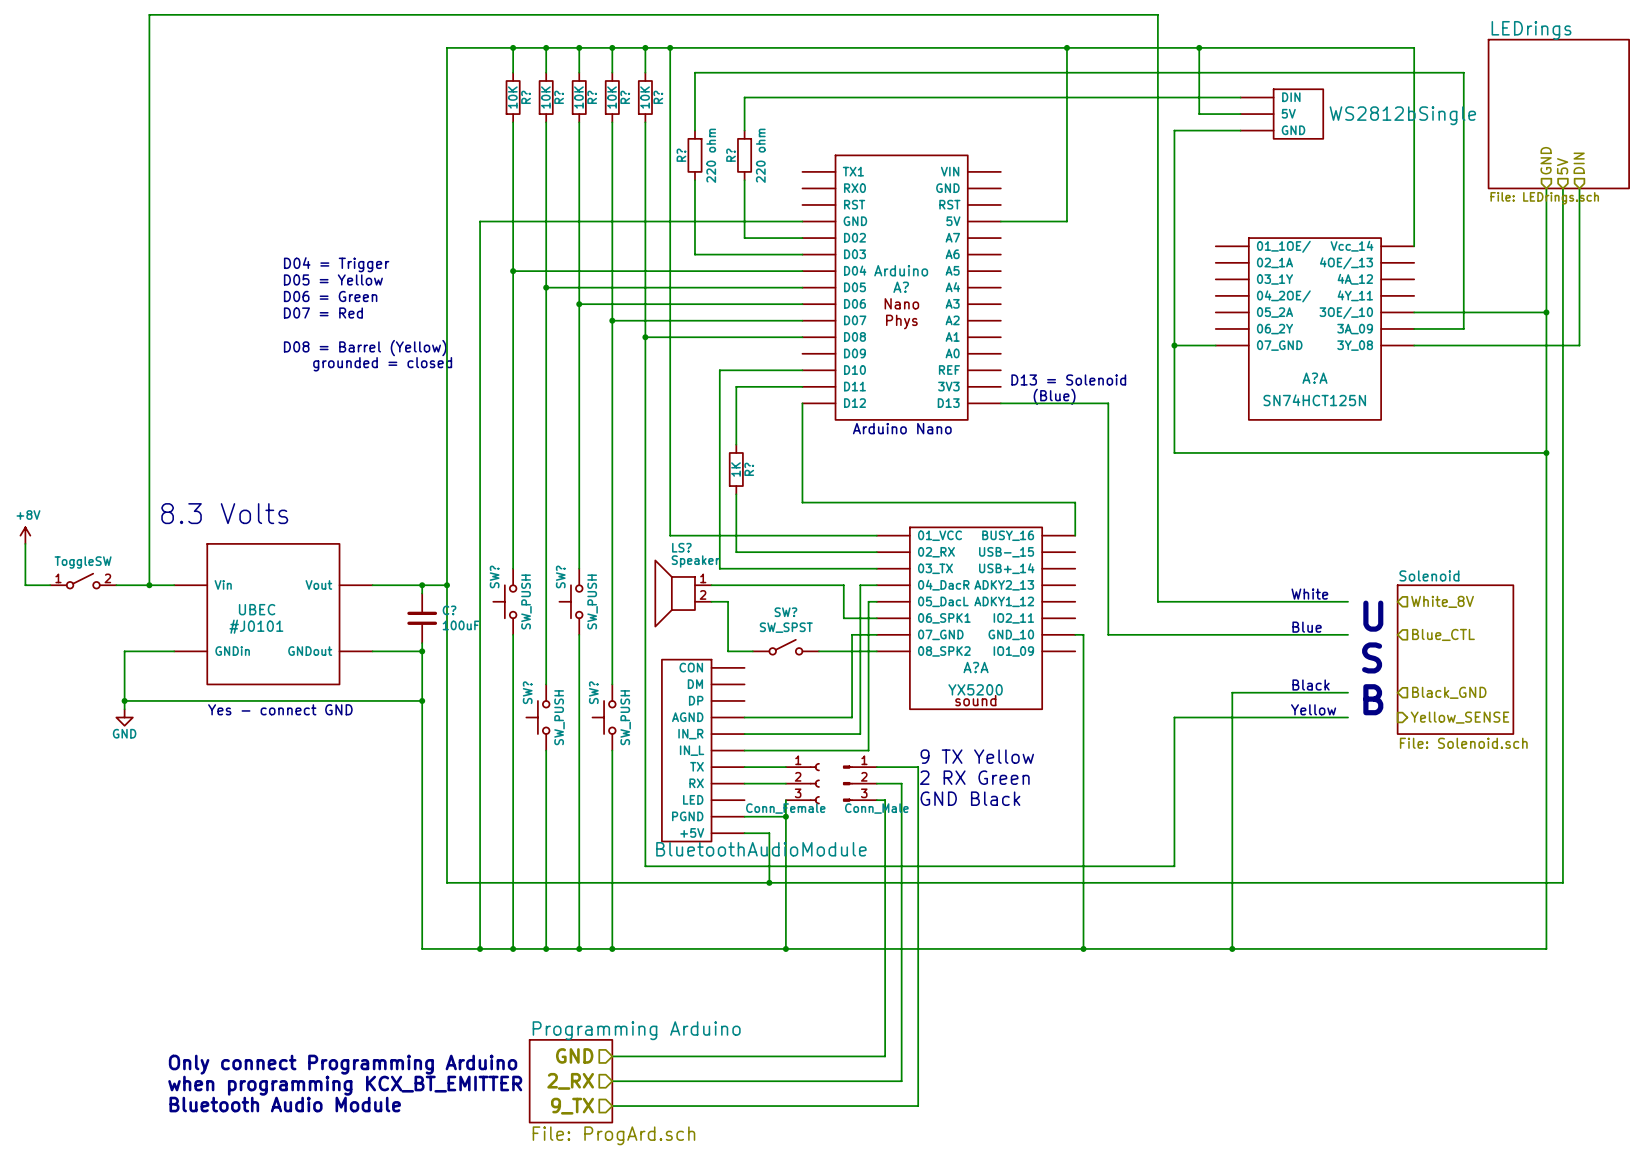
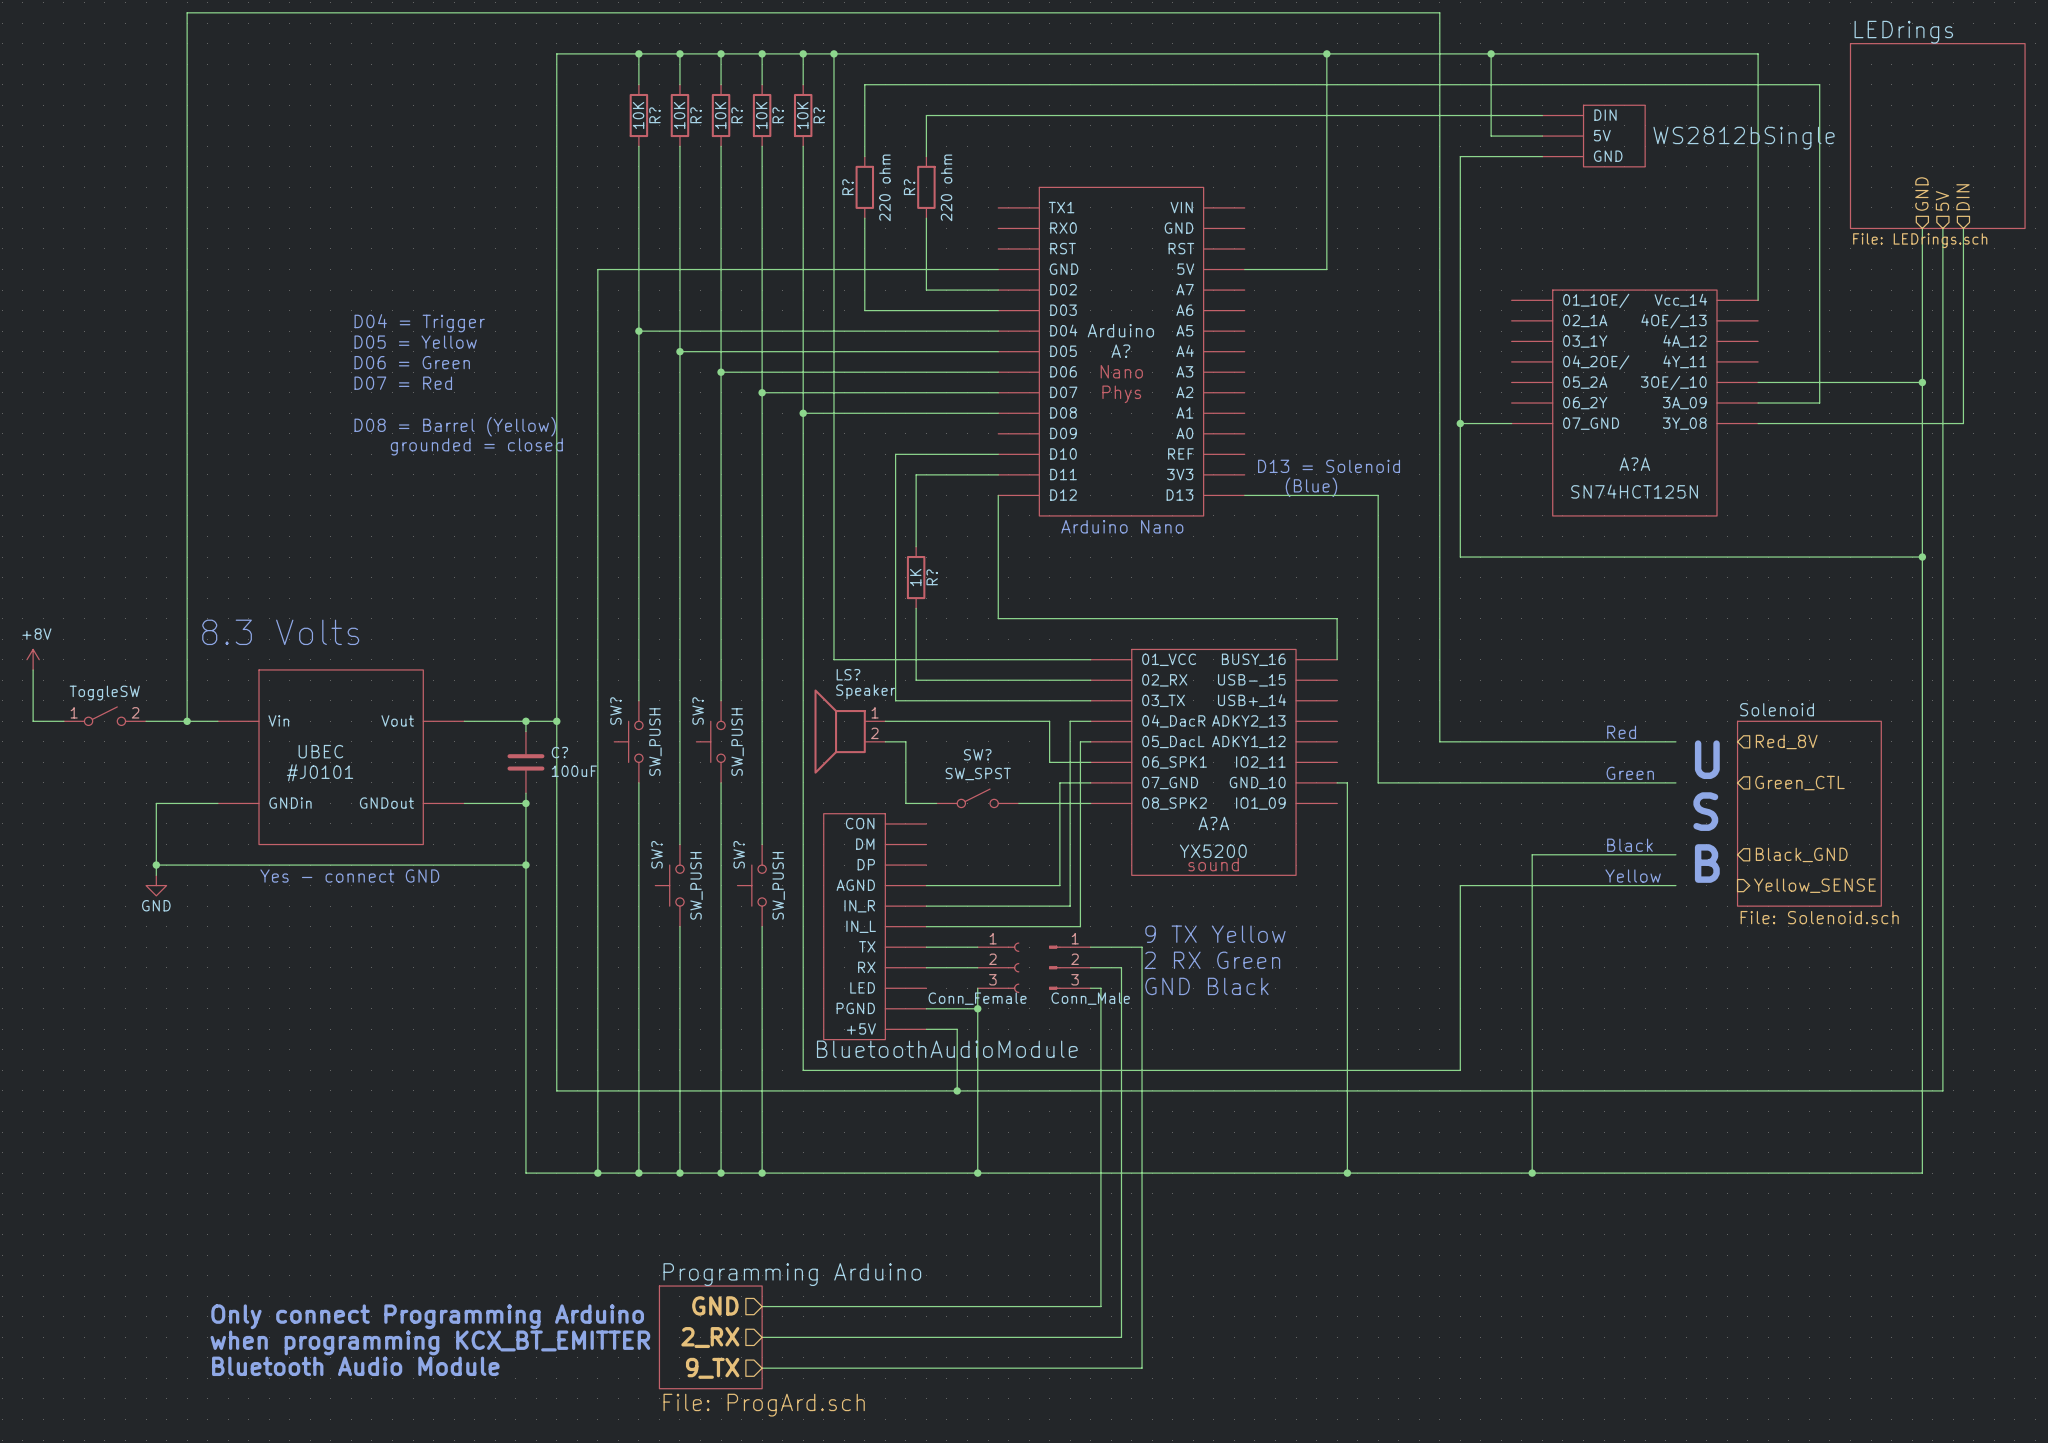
text: White (1309, 594) -> Red (1621, 732)
hierarchical label: White_8V (1442, 601) -> Red_8V (1786, 741)
text: Blue (1307, 627) -> Green (1630, 773)
hierarchical label: Blue_CTL (1443, 634) -> Green_CTL (1799, 783)

